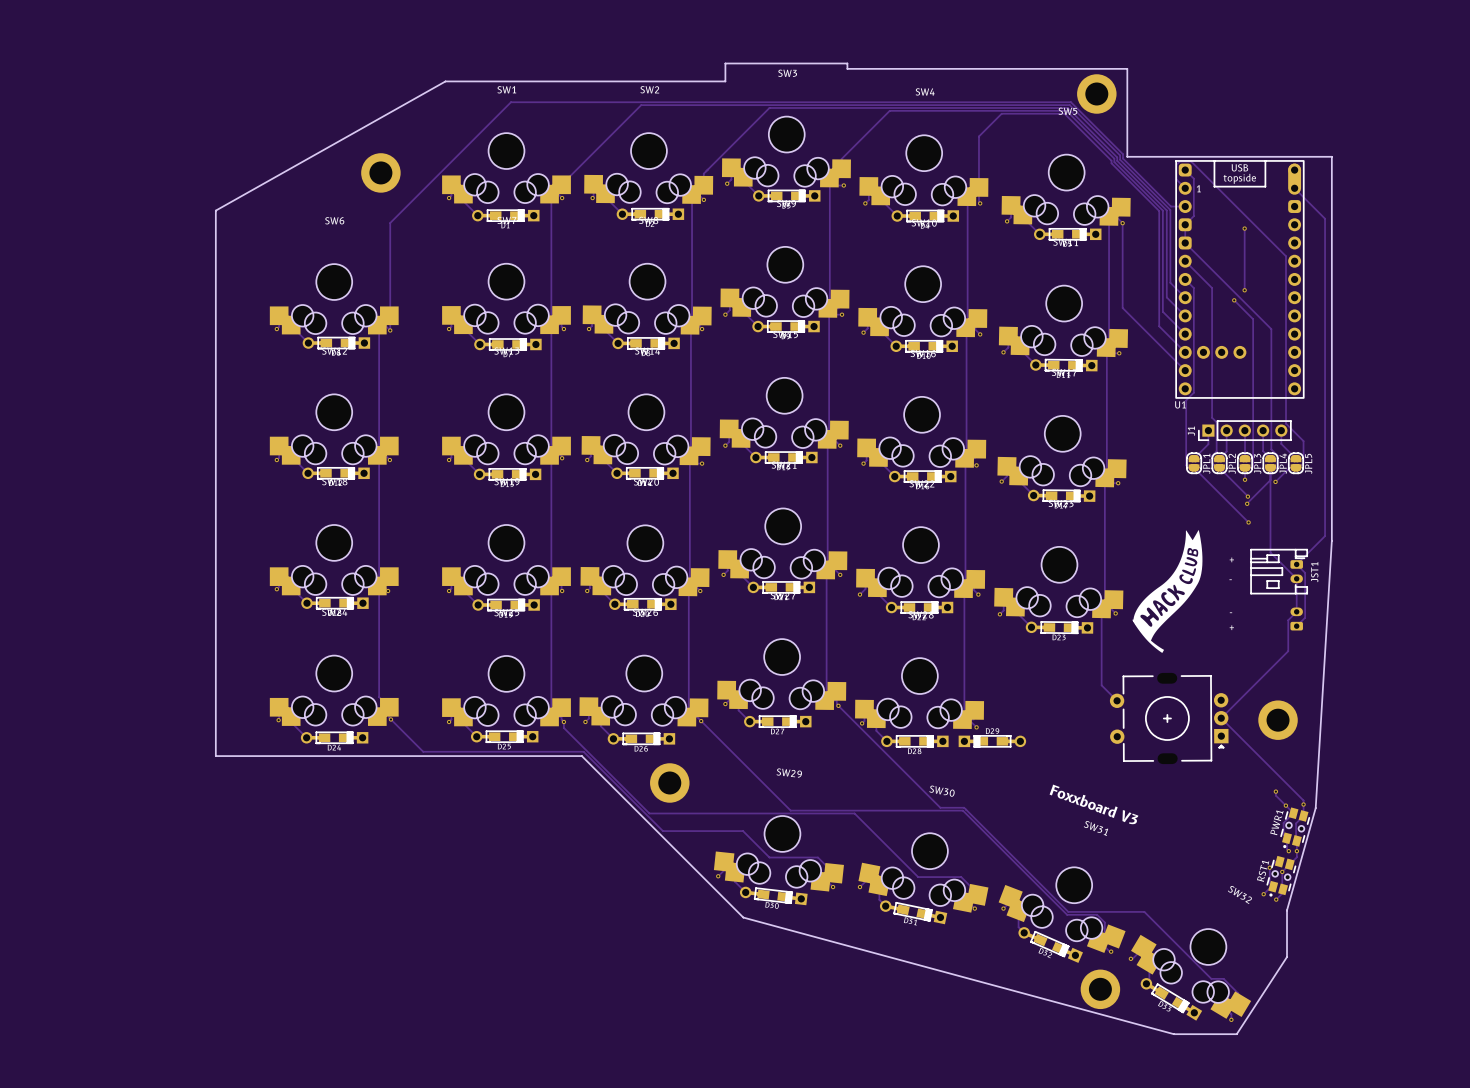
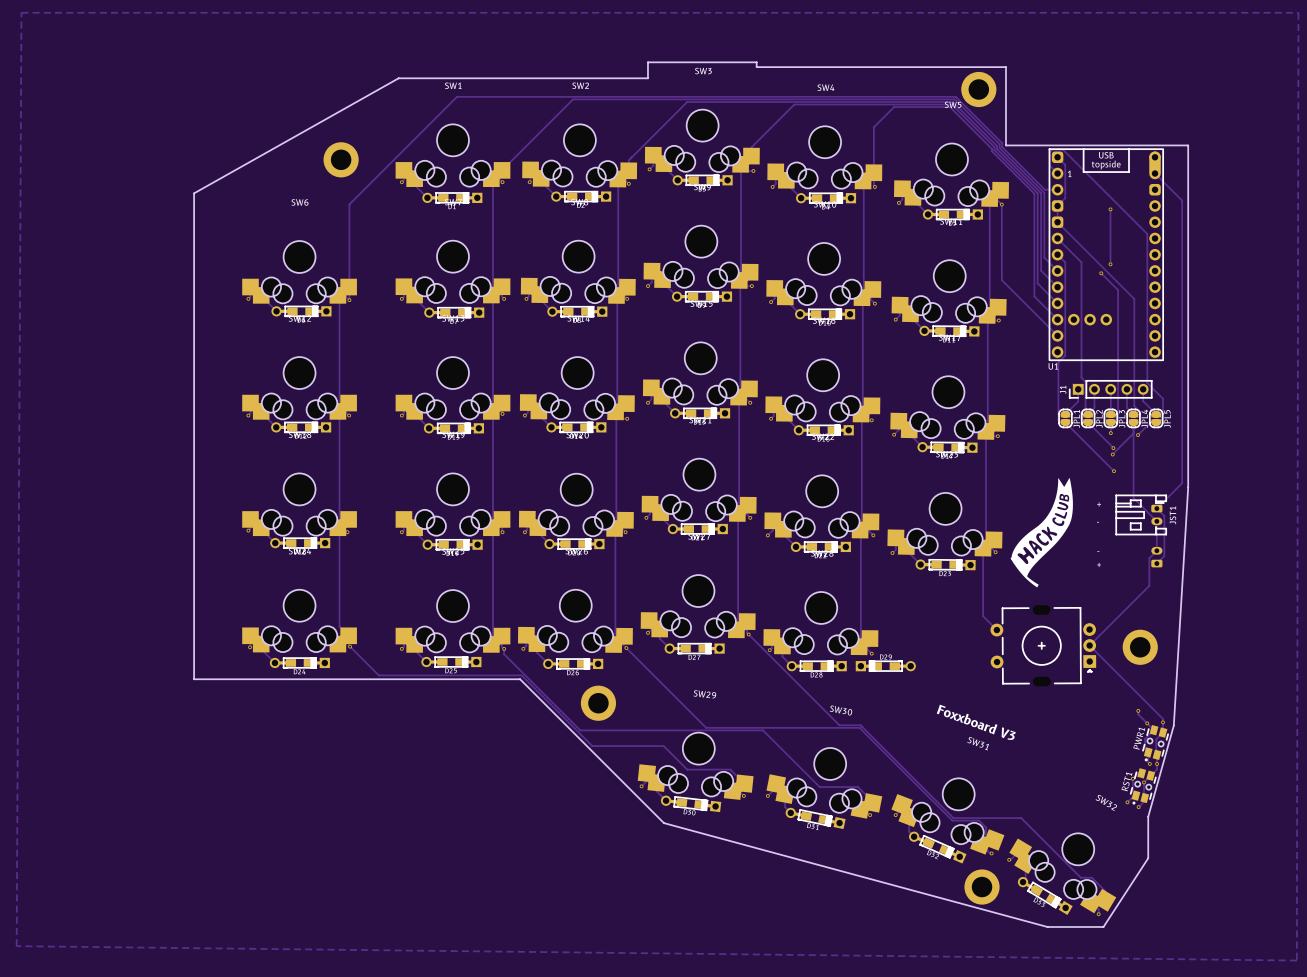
zone outline: none -> (21, 12) (16, 946) (1296, 960) (1298, 12) (21, 12)

